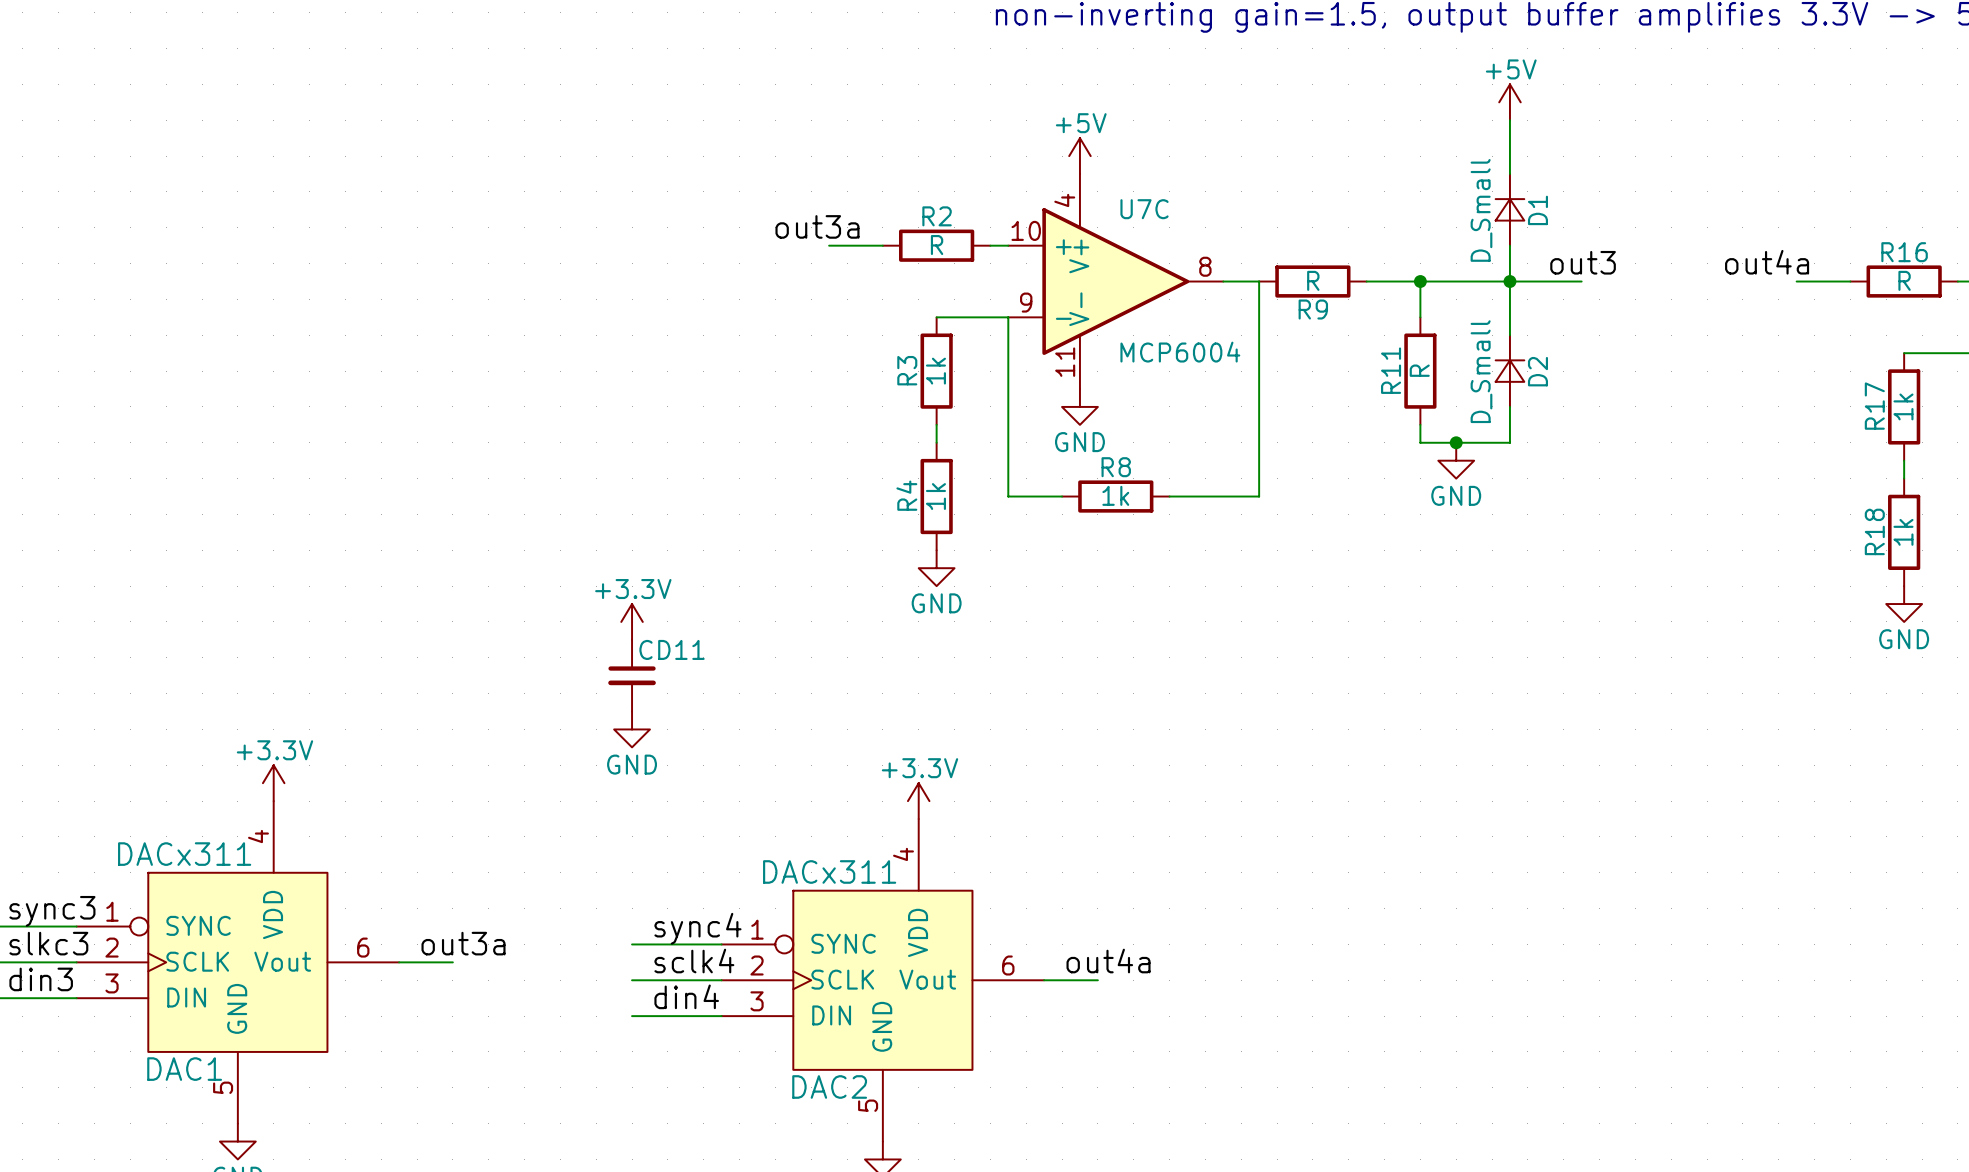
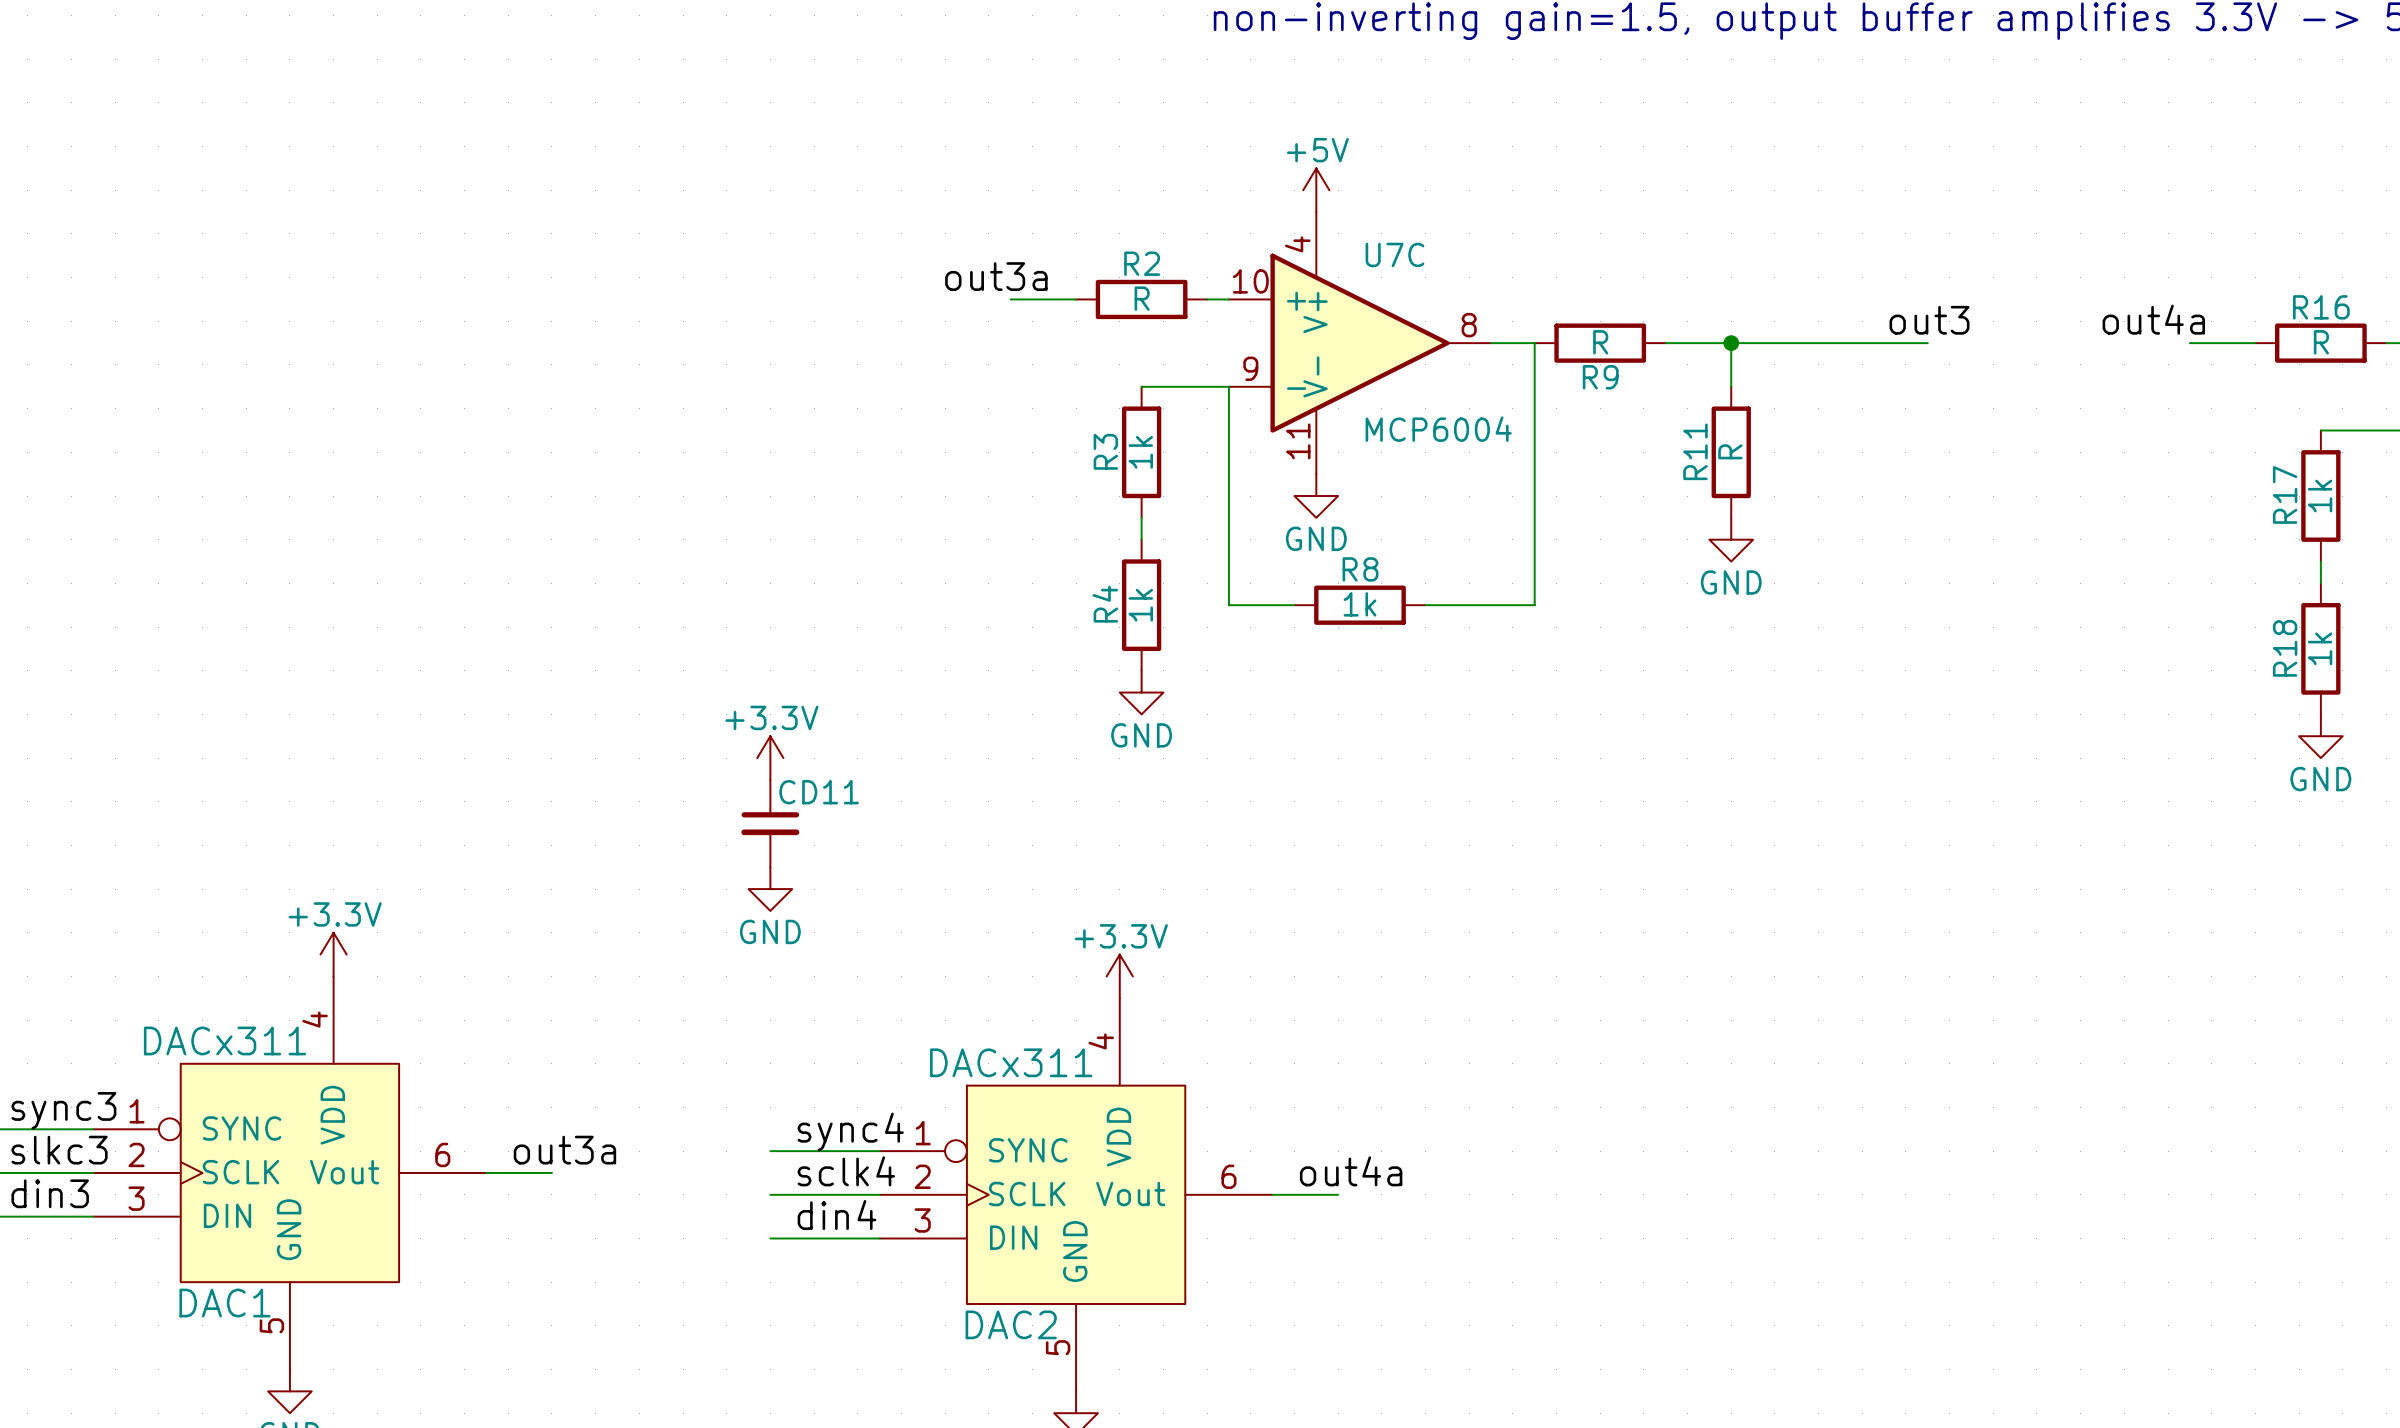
power symbol: +5V (1509, 102) -> none
wire: (1509, 120) (1509, 174) -> none
D1: D_Small (1509, 209) -> none
wire: (1509, 245) (1509, 335) -> none
junction: (1509, 281) -> none
D2: D_Small (1509, 371) -> none
wire: (1509, 406) (1509, 442) (1420, 442) (1420, 424) -> none
junction: (1456, 442) -> none
power symbol position: GND (1456, 460) -> GND (1731, 539)

